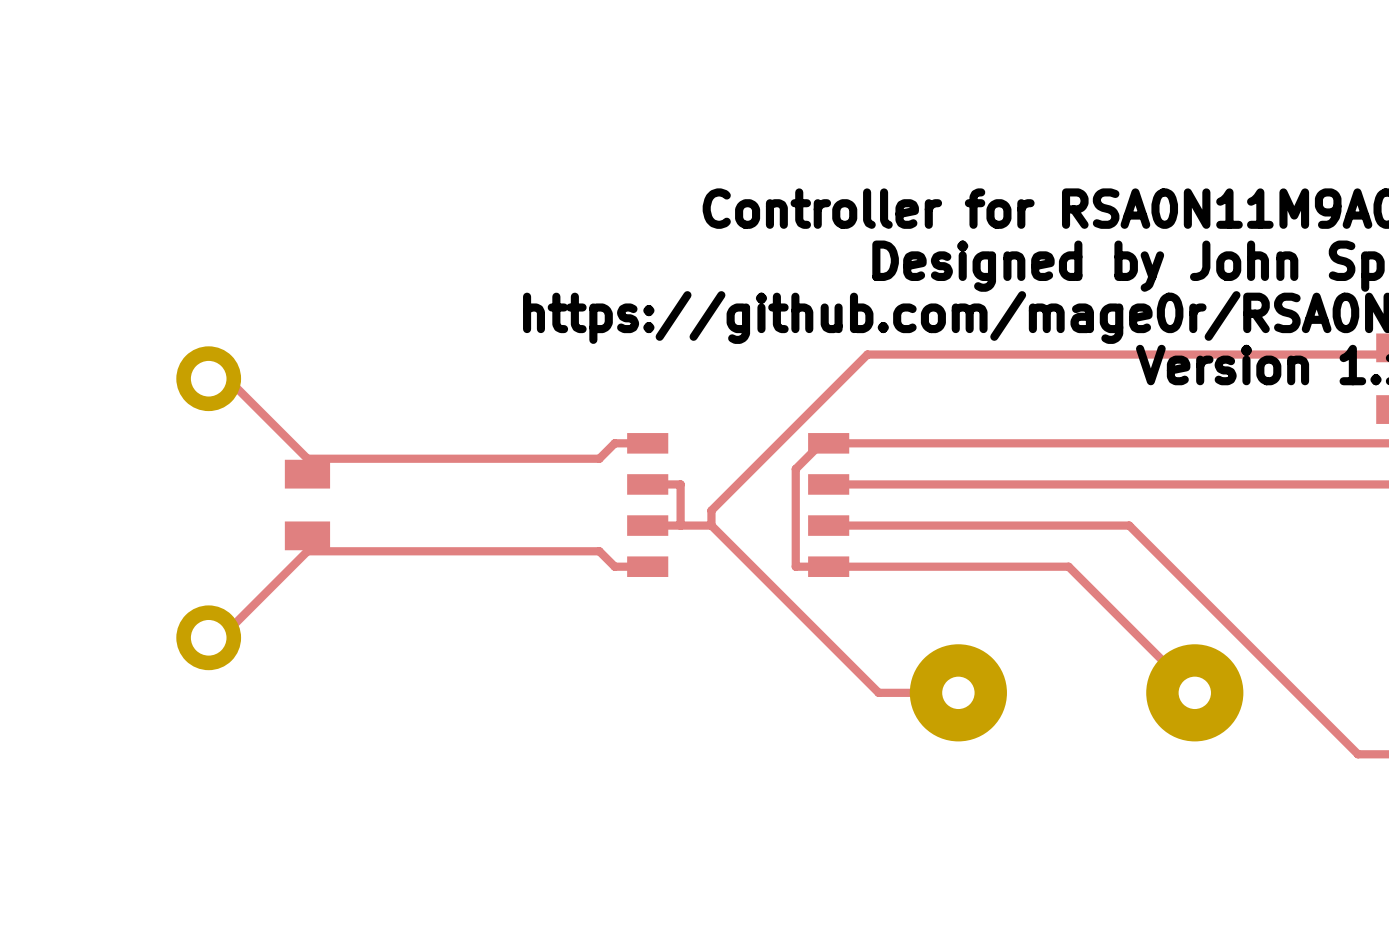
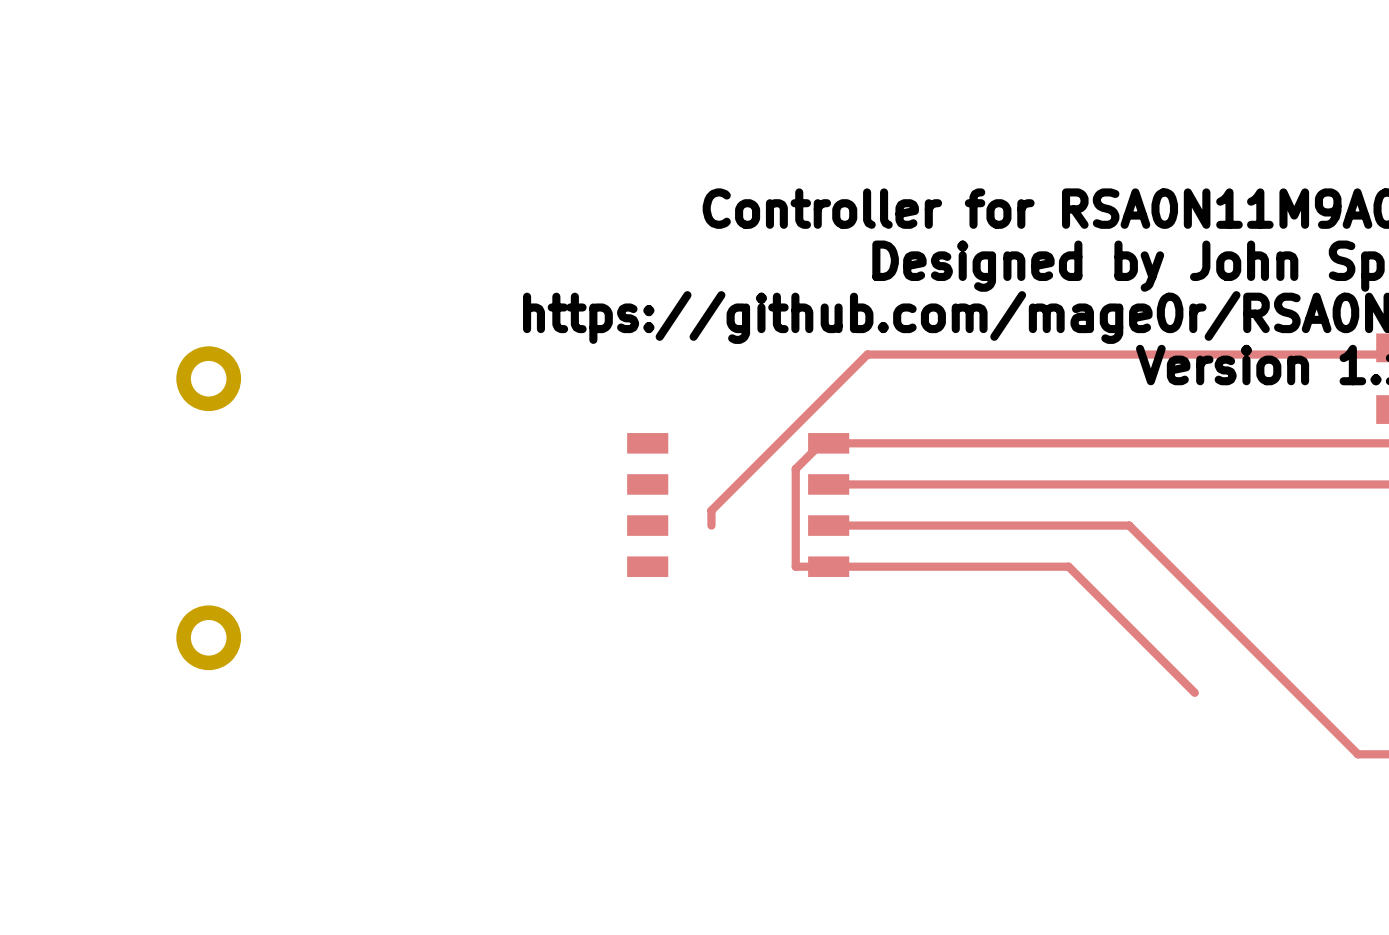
top track: (208, 378) (227, 378) (307, 458) -> none
top track: (647, 443) (614, 443) (599, 458) (307, 458) -> none
top track: (647, 484) (680, 484) (680, 525) -> none
part: (307, 505) -> none
top track: (647, 525) (711, 525) (878, 692) (958, 692) -> none
top track: (307, 551) (599, 551) (614, 566) (647, 566) -> none
top track: (307, 551) (220, 637) (208, 637) -> none
part: (958, 692) -> none
part: (1194, 692) -> none

